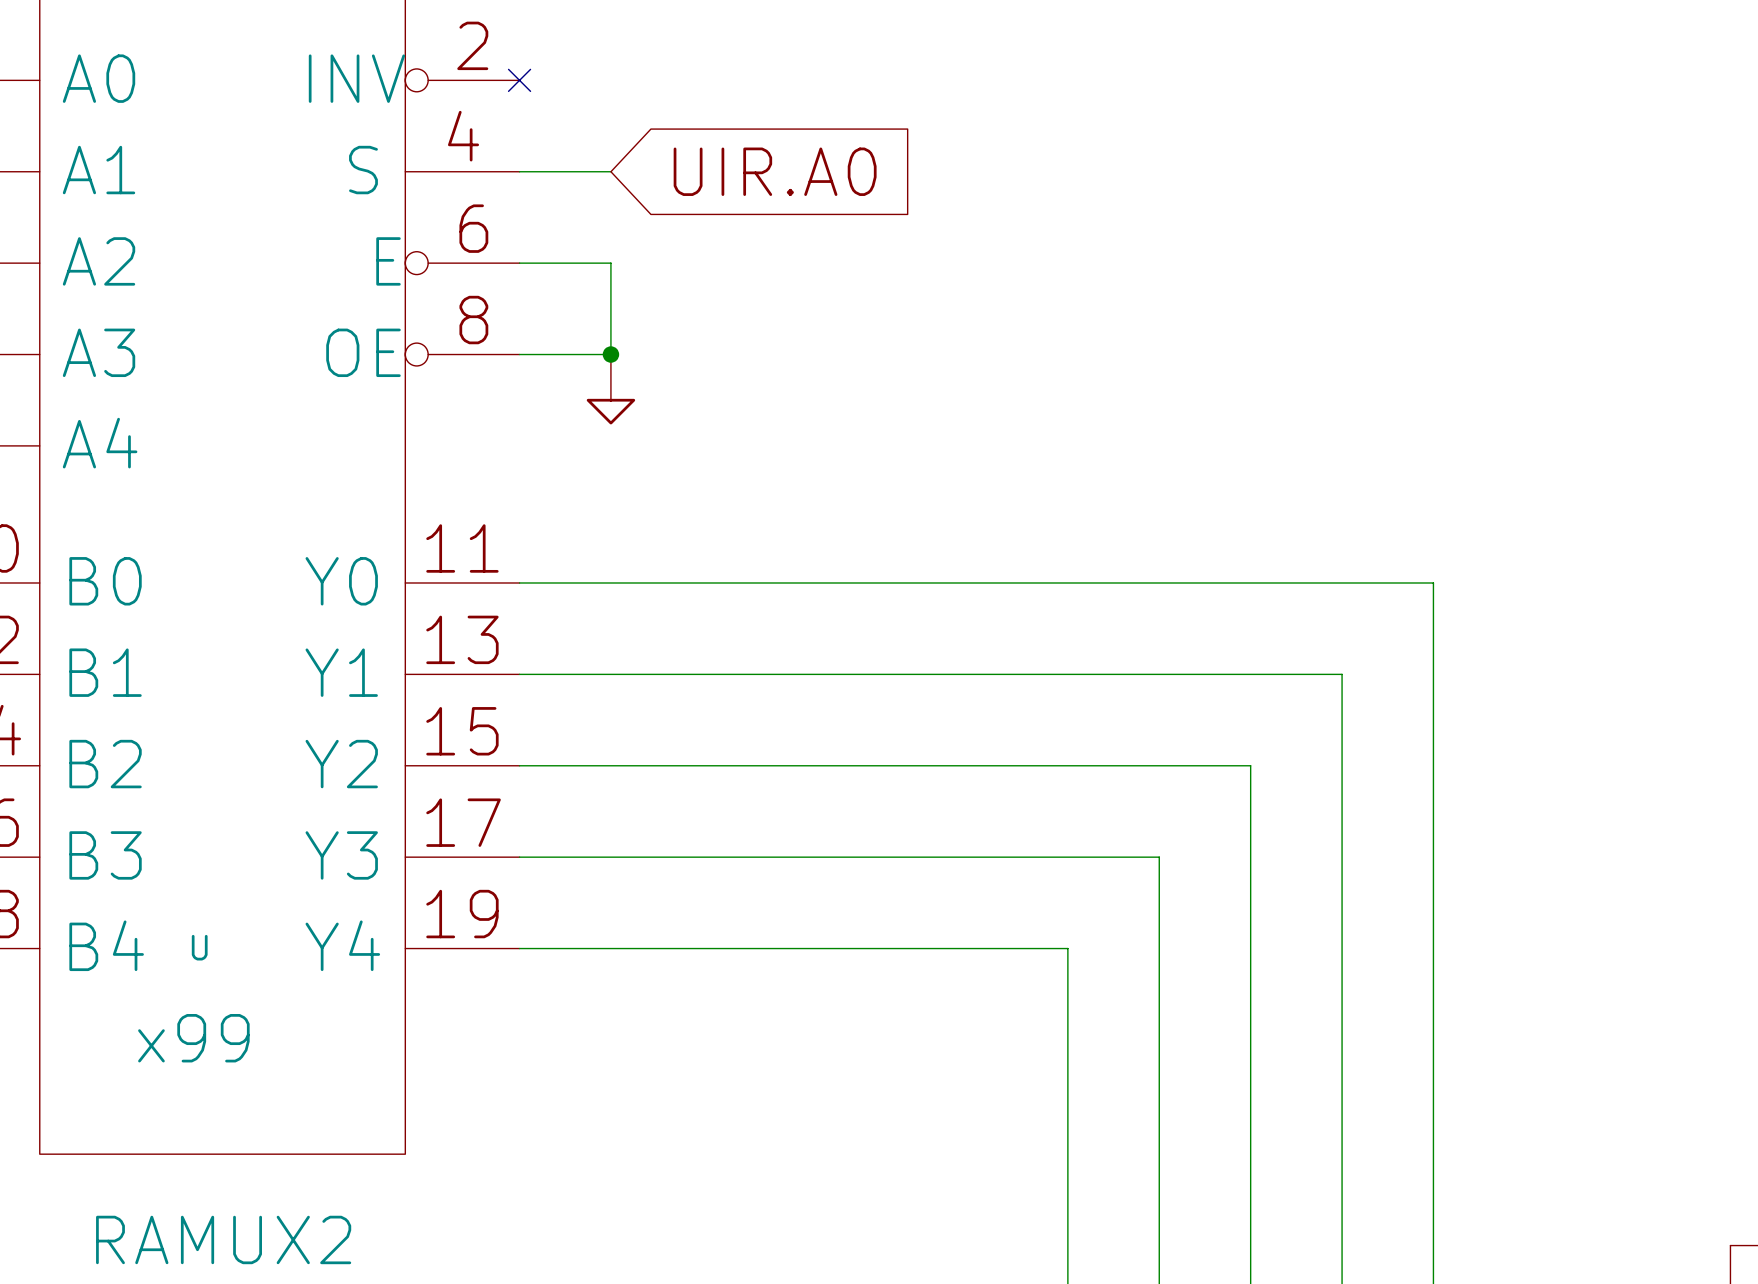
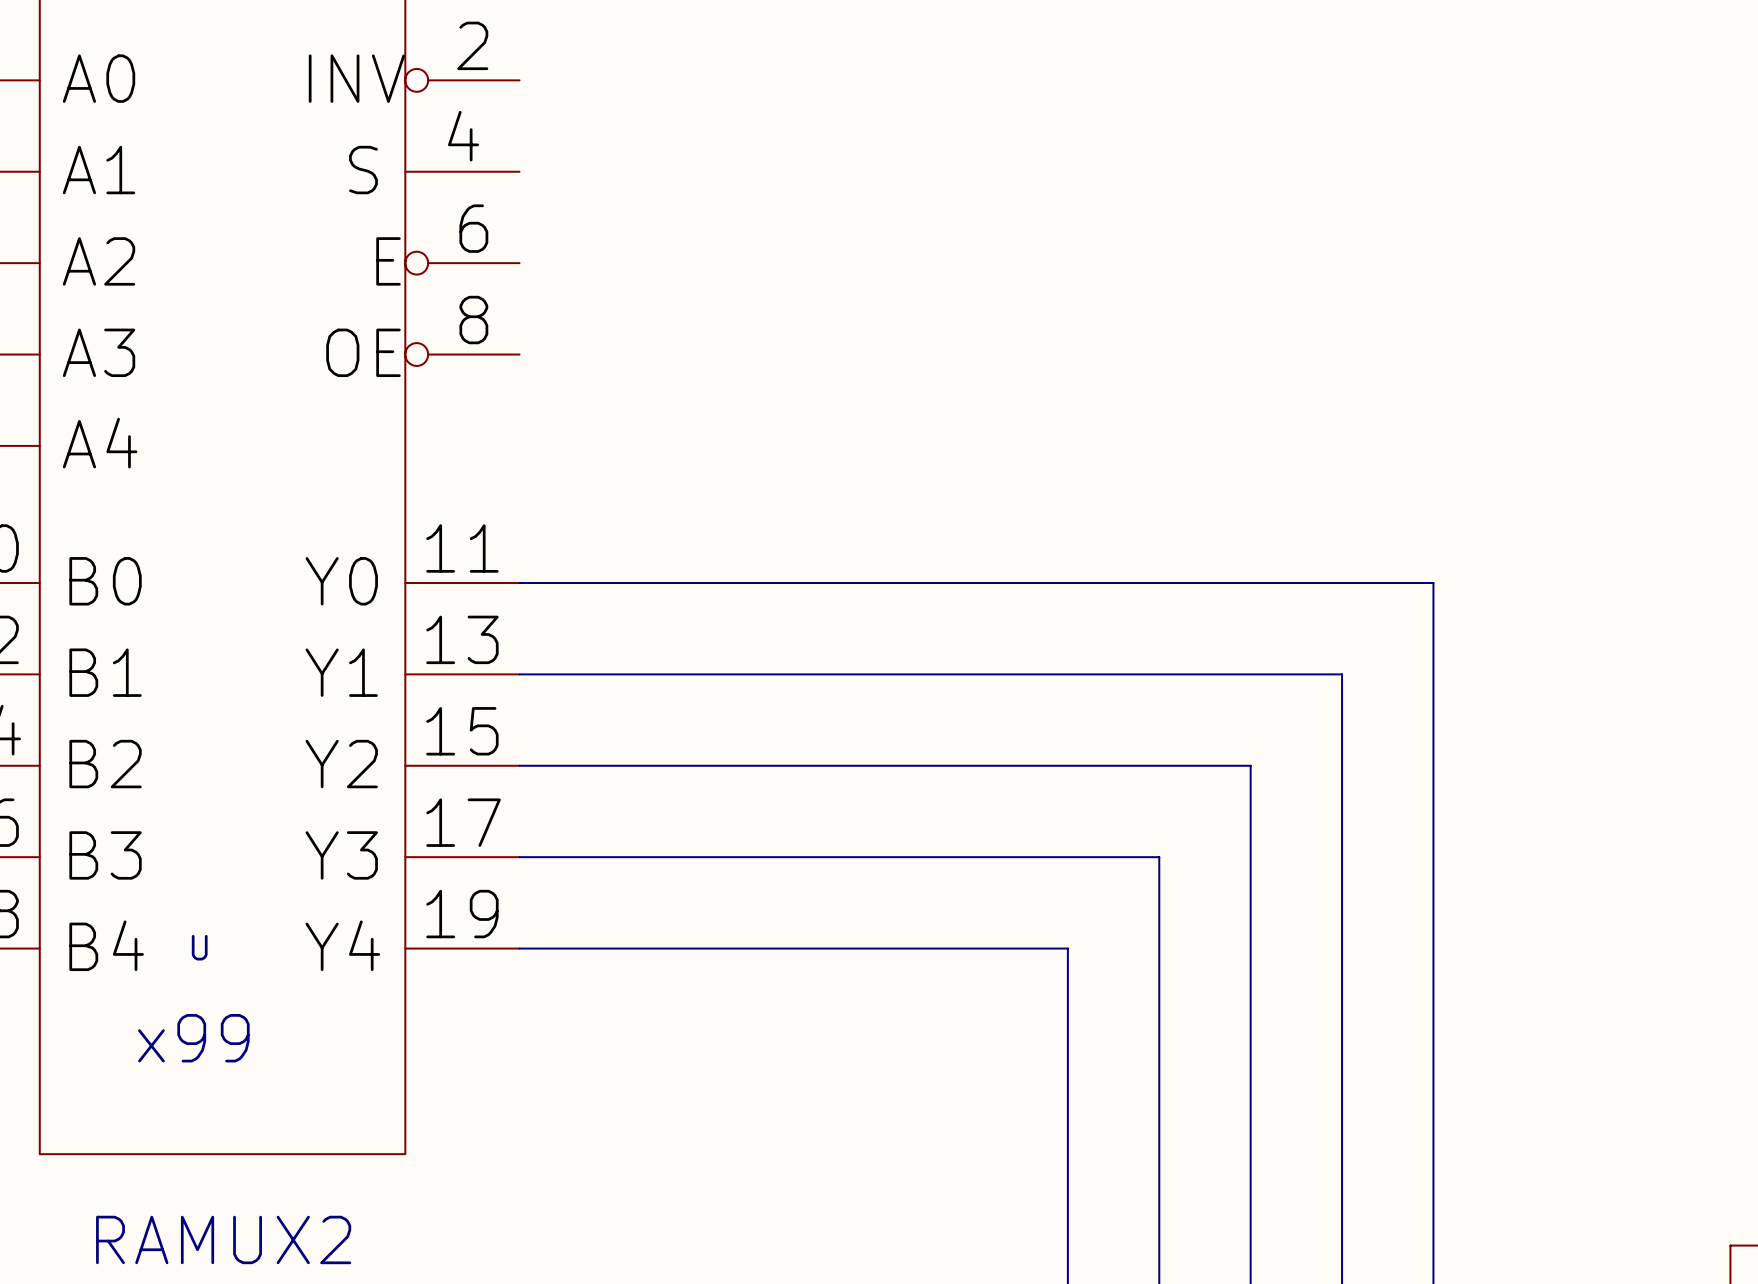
no-connect mark: (519, 80) -> none
wire: (519, 171) (610, 171) -> none
global label: UIR.A0 (775, 171) -> none
wire: (519, 263) (610, 263) (610, 354) (519, 354) -> none
junction: (610, 354) -> none
power symbol: (610, 389) -> none

